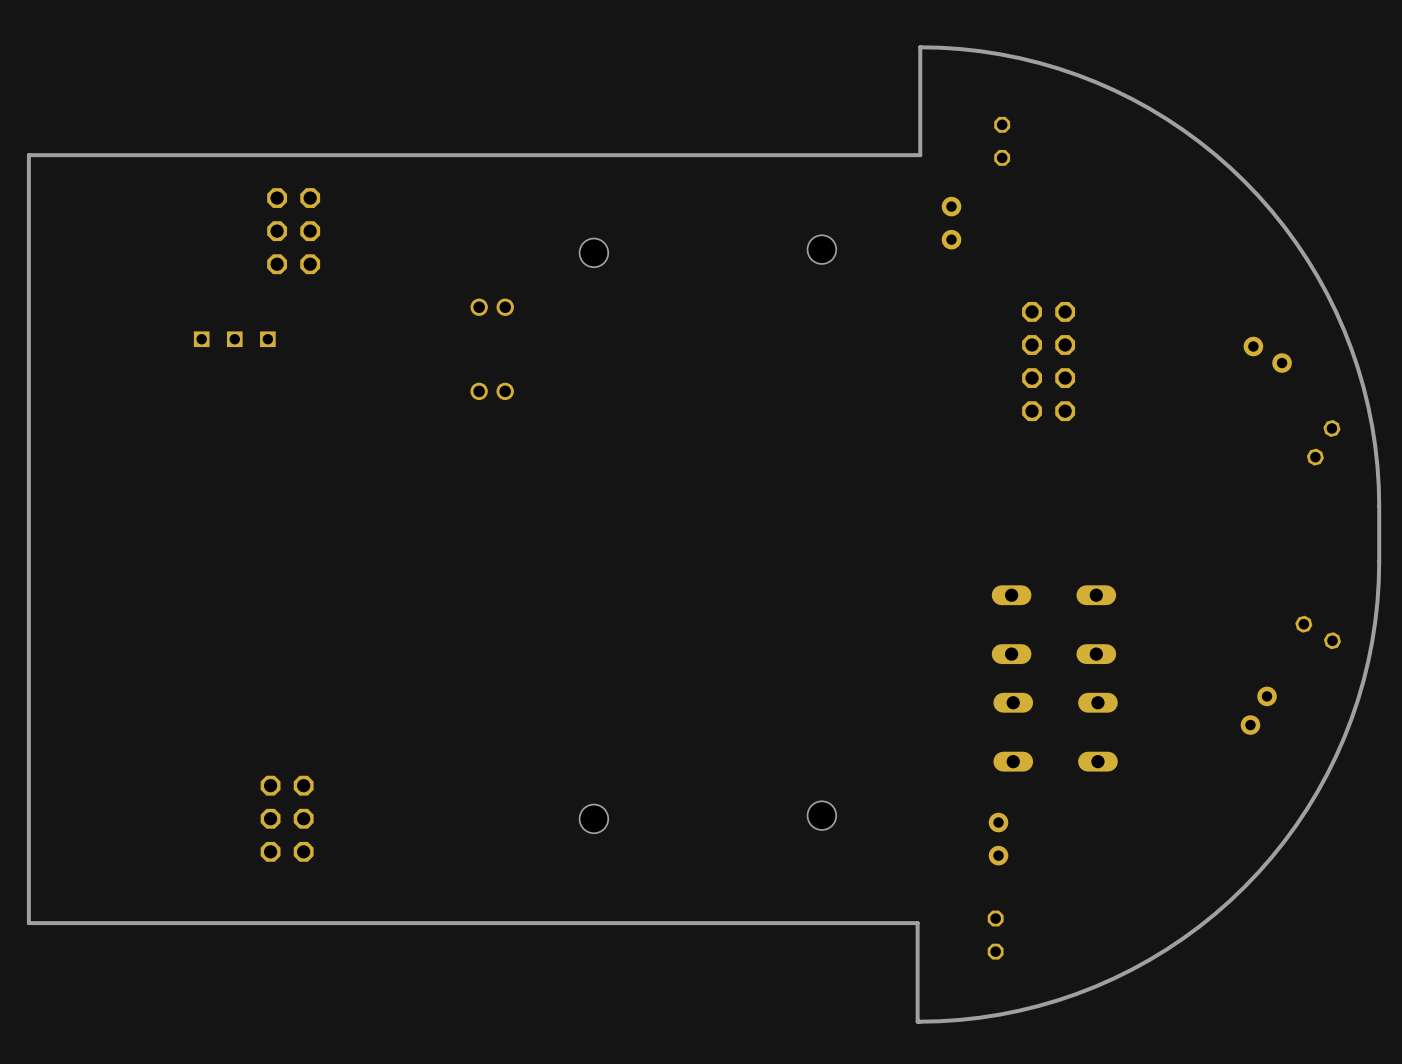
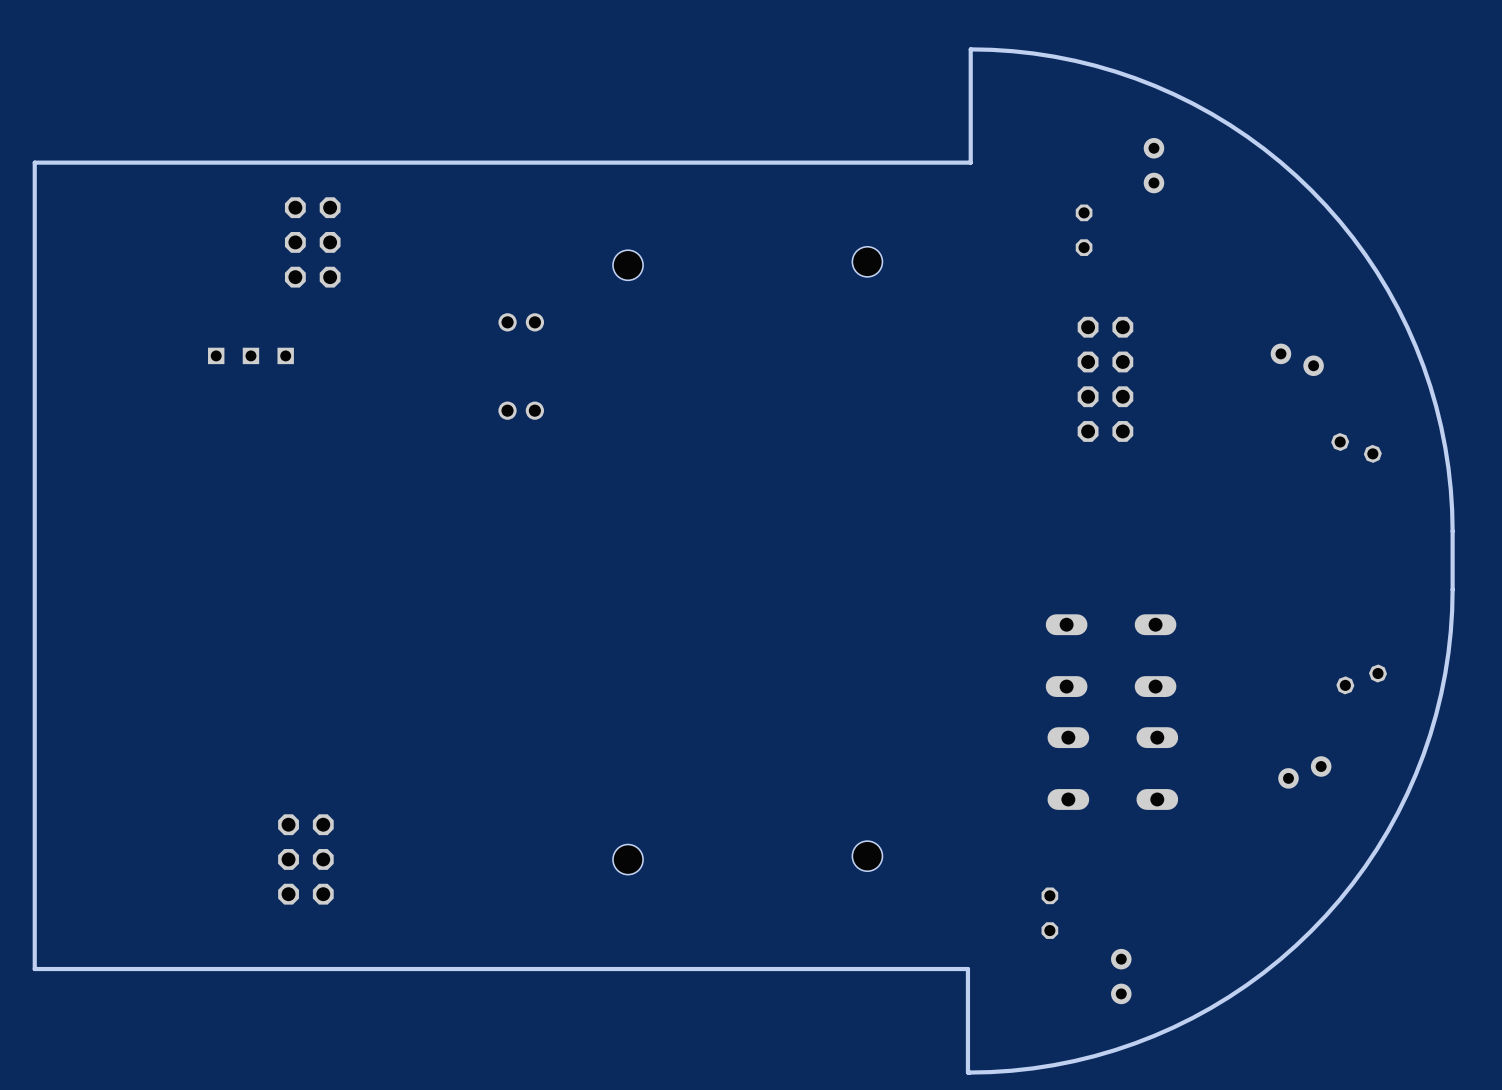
part position: (1002, 141) -> (1084, 230)
part position: (951, 223) -> (1153, 165)
part: none -> (1297, 359)
part: (1267, 354) -> none
part: none -> (1356, 447)
part: (1323, 442) -> none
part: (1318, 632) -> none
part: none -> (1361, 679)
part: (1258, 710) -> none
part: none -> (1304, 772)
part position: (998, 839) -> (1121, 976)
part position: (995, 935) -> (1049, 913)

